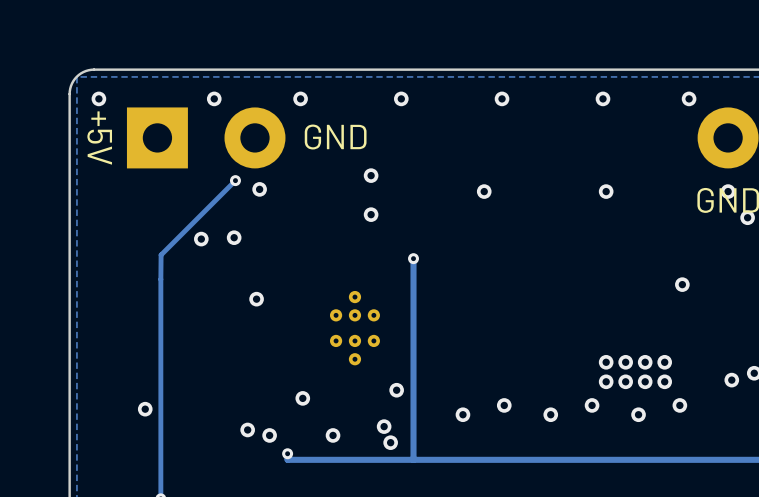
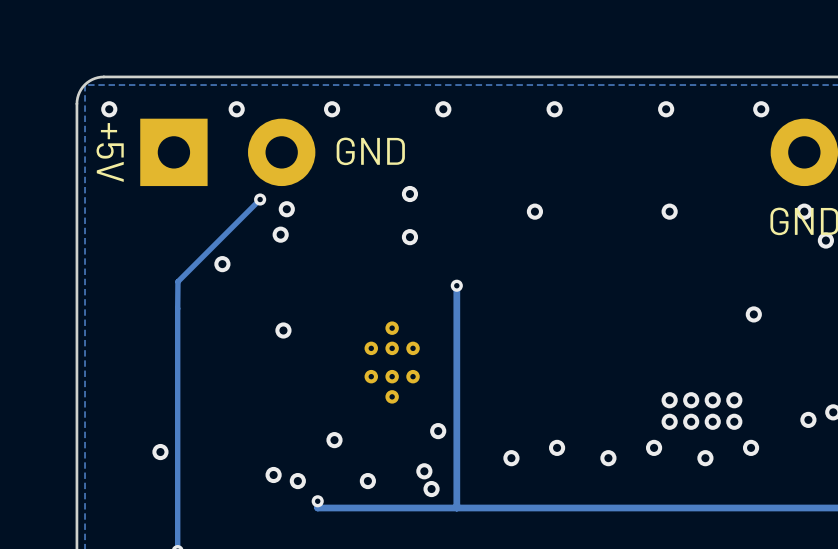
via position: (234, 237) -> (280, 234)

